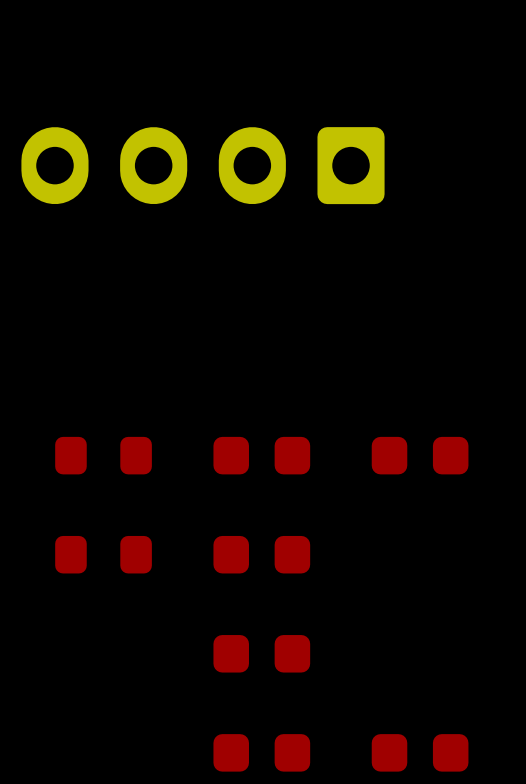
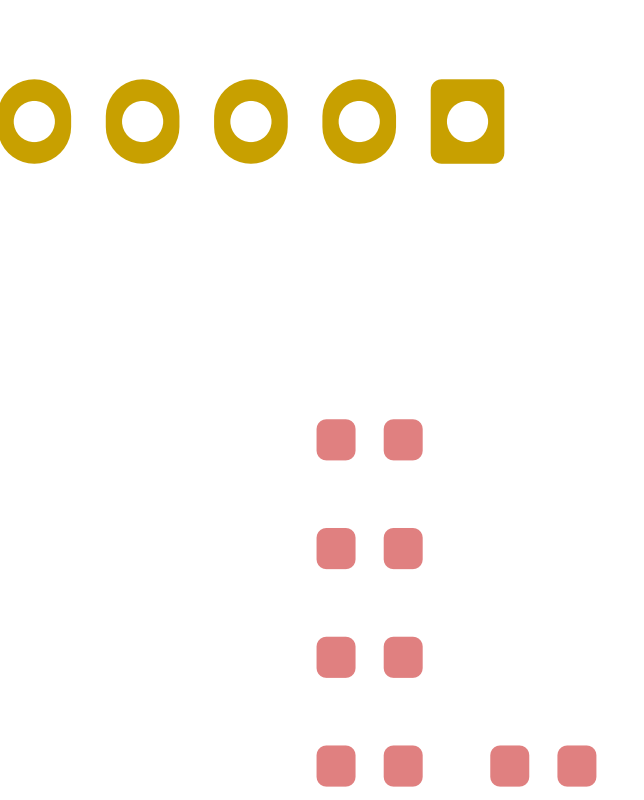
part: (103, 455) -> none
part: (420, 455) -> none
part: (103, 554) -> none

